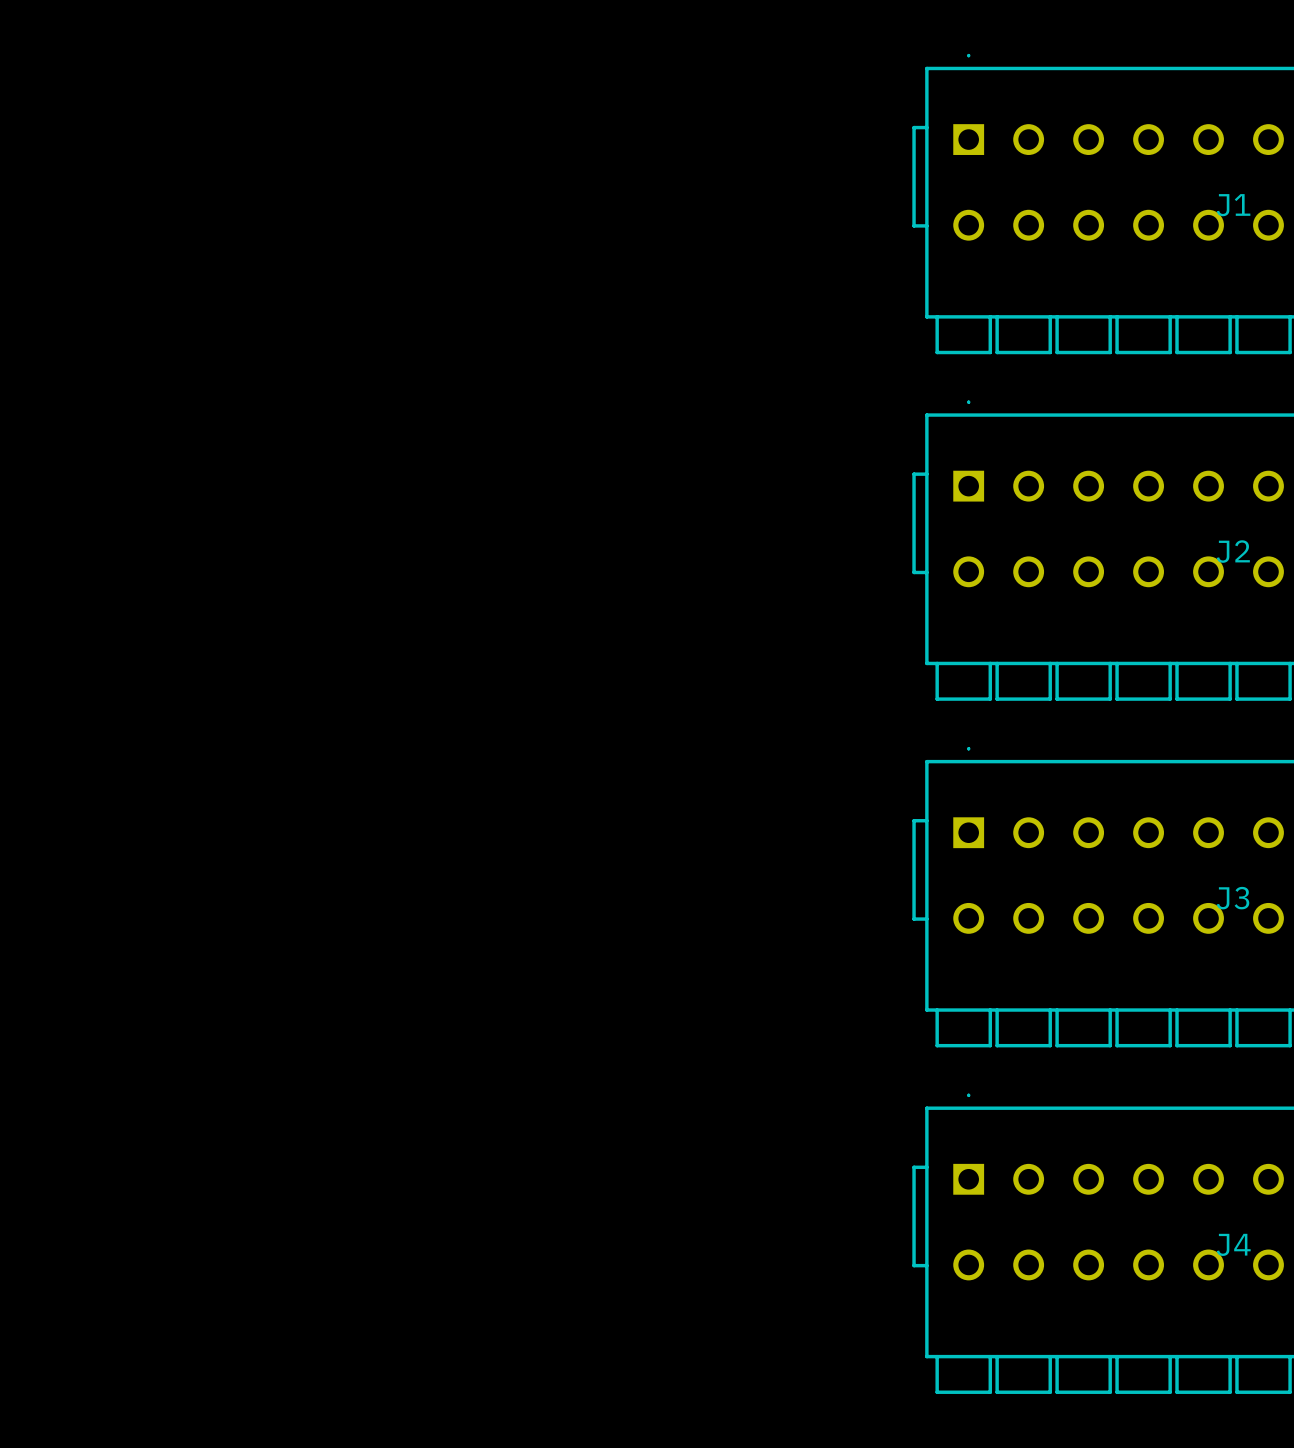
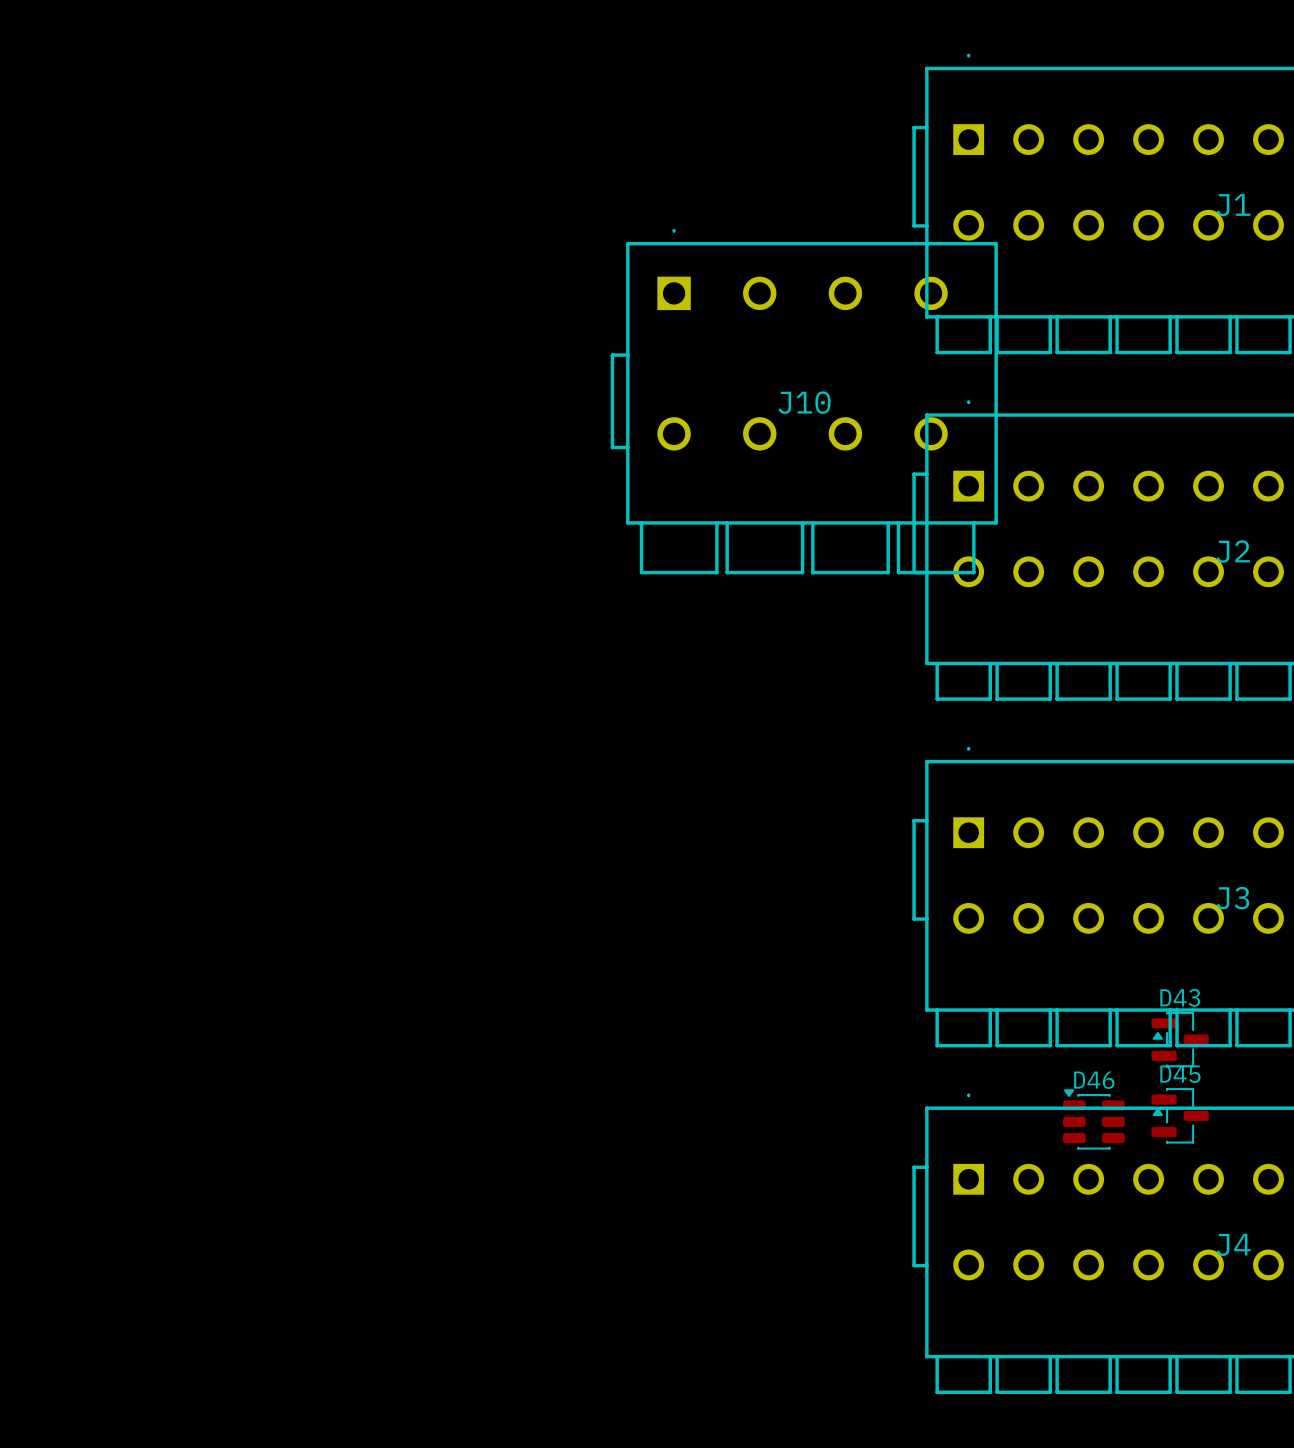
J10: none -> (804, 401)
D43: none -> (1180, 1039)
D45: none -> (1180, 1115)
D46: none -> (1093, 1119)

